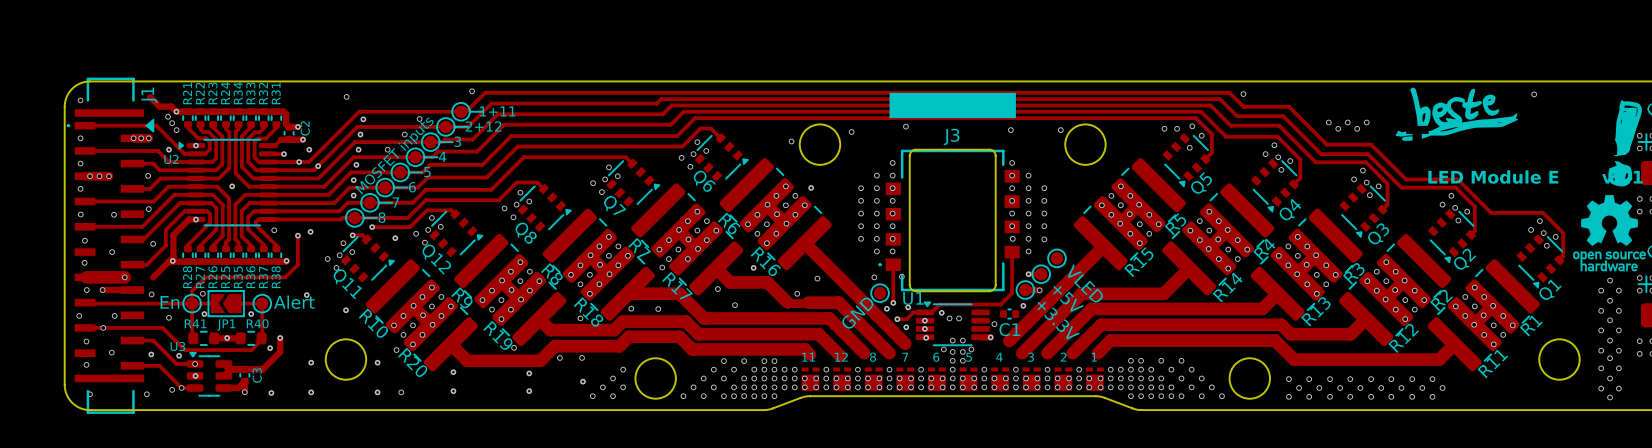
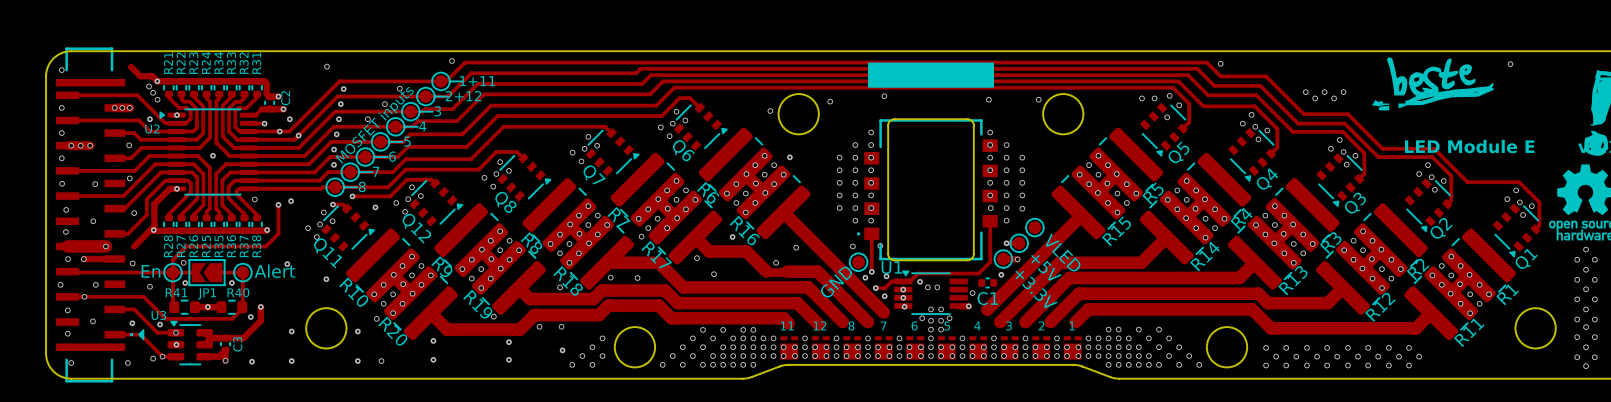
J3 name: J3 (951, 136) -> none
J1: (110, 245) -> none
part: none -> (94, 214)
drawing: none -> [138, 328, 145, 341]

